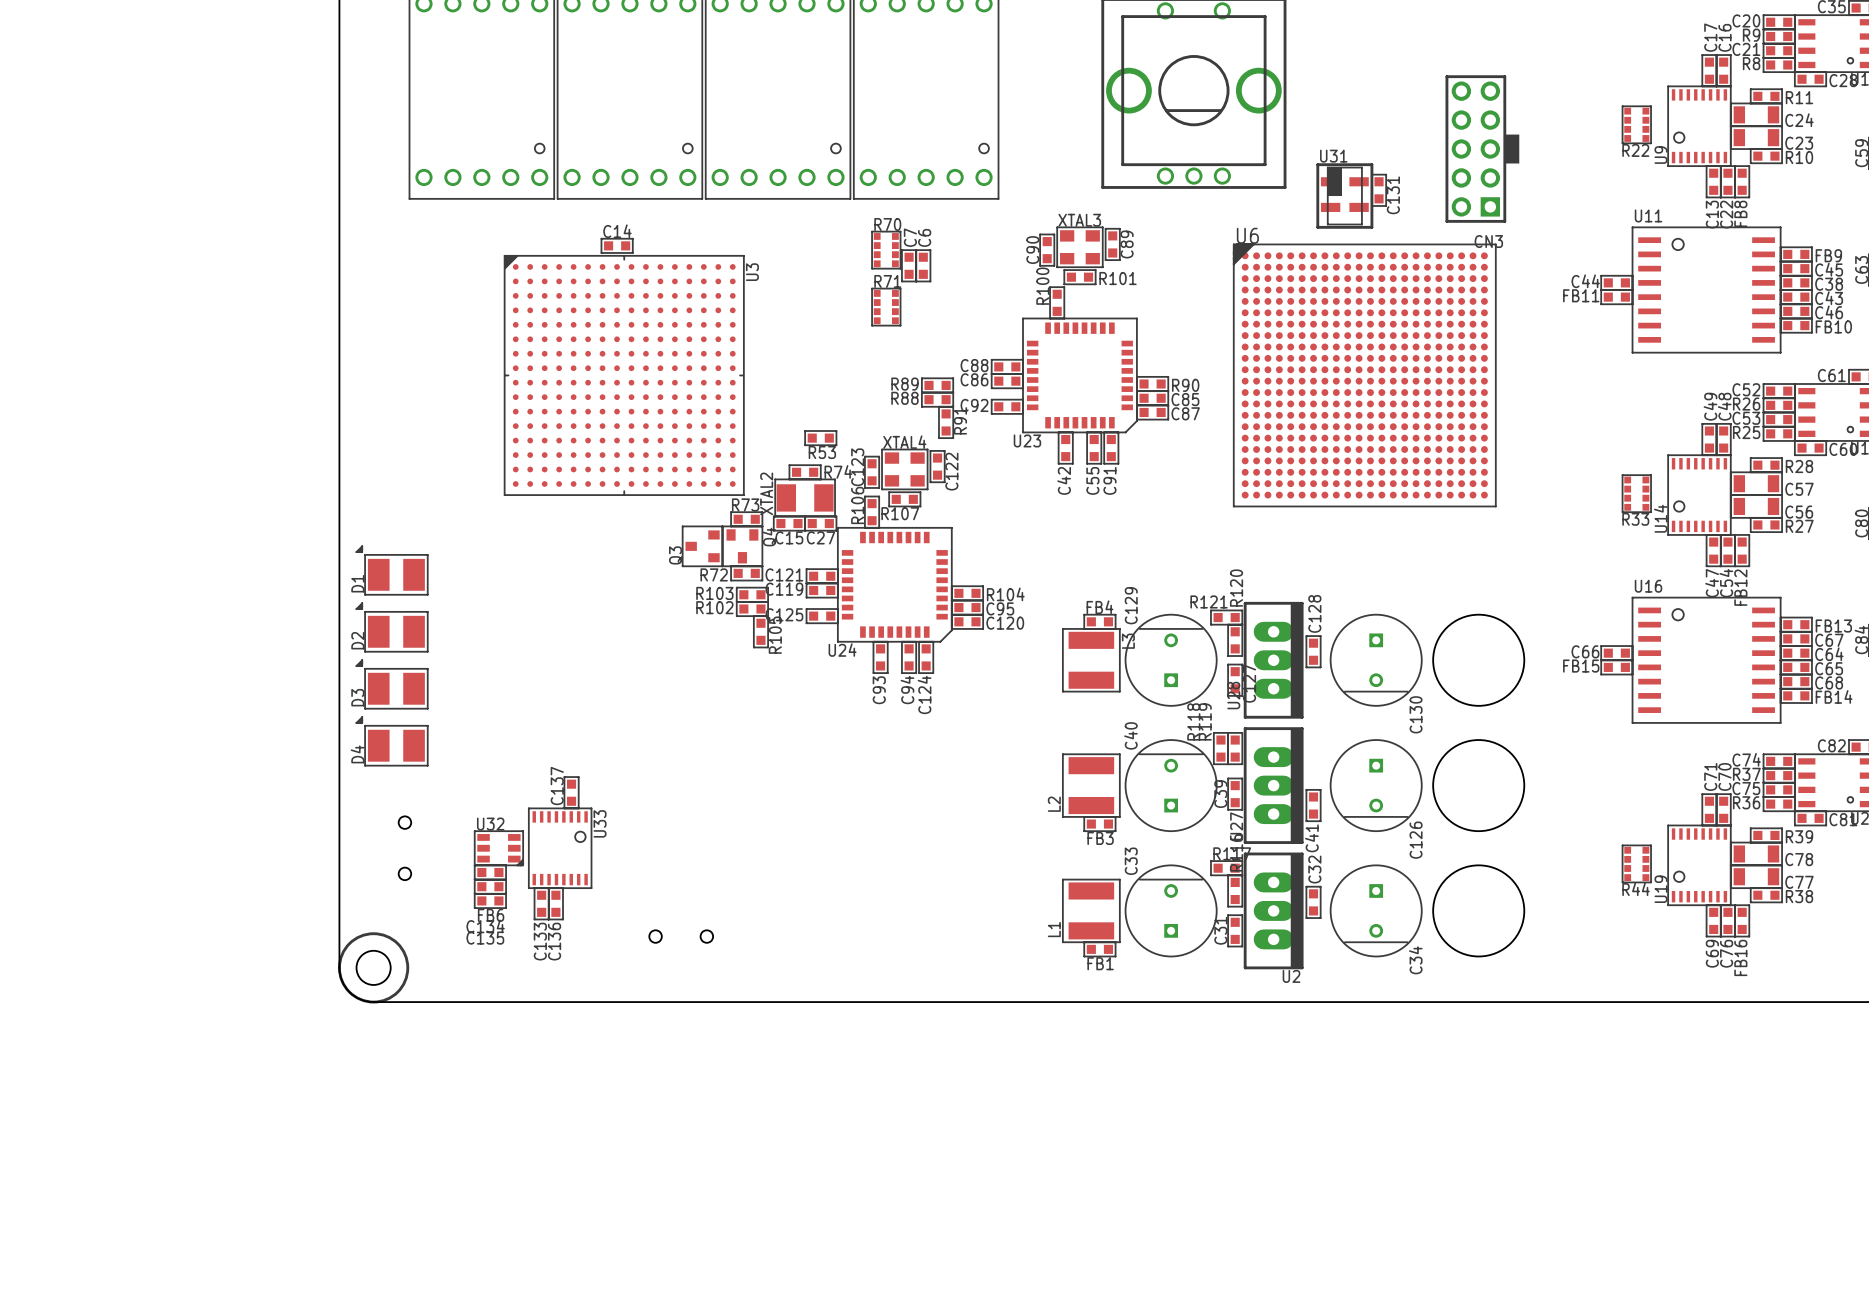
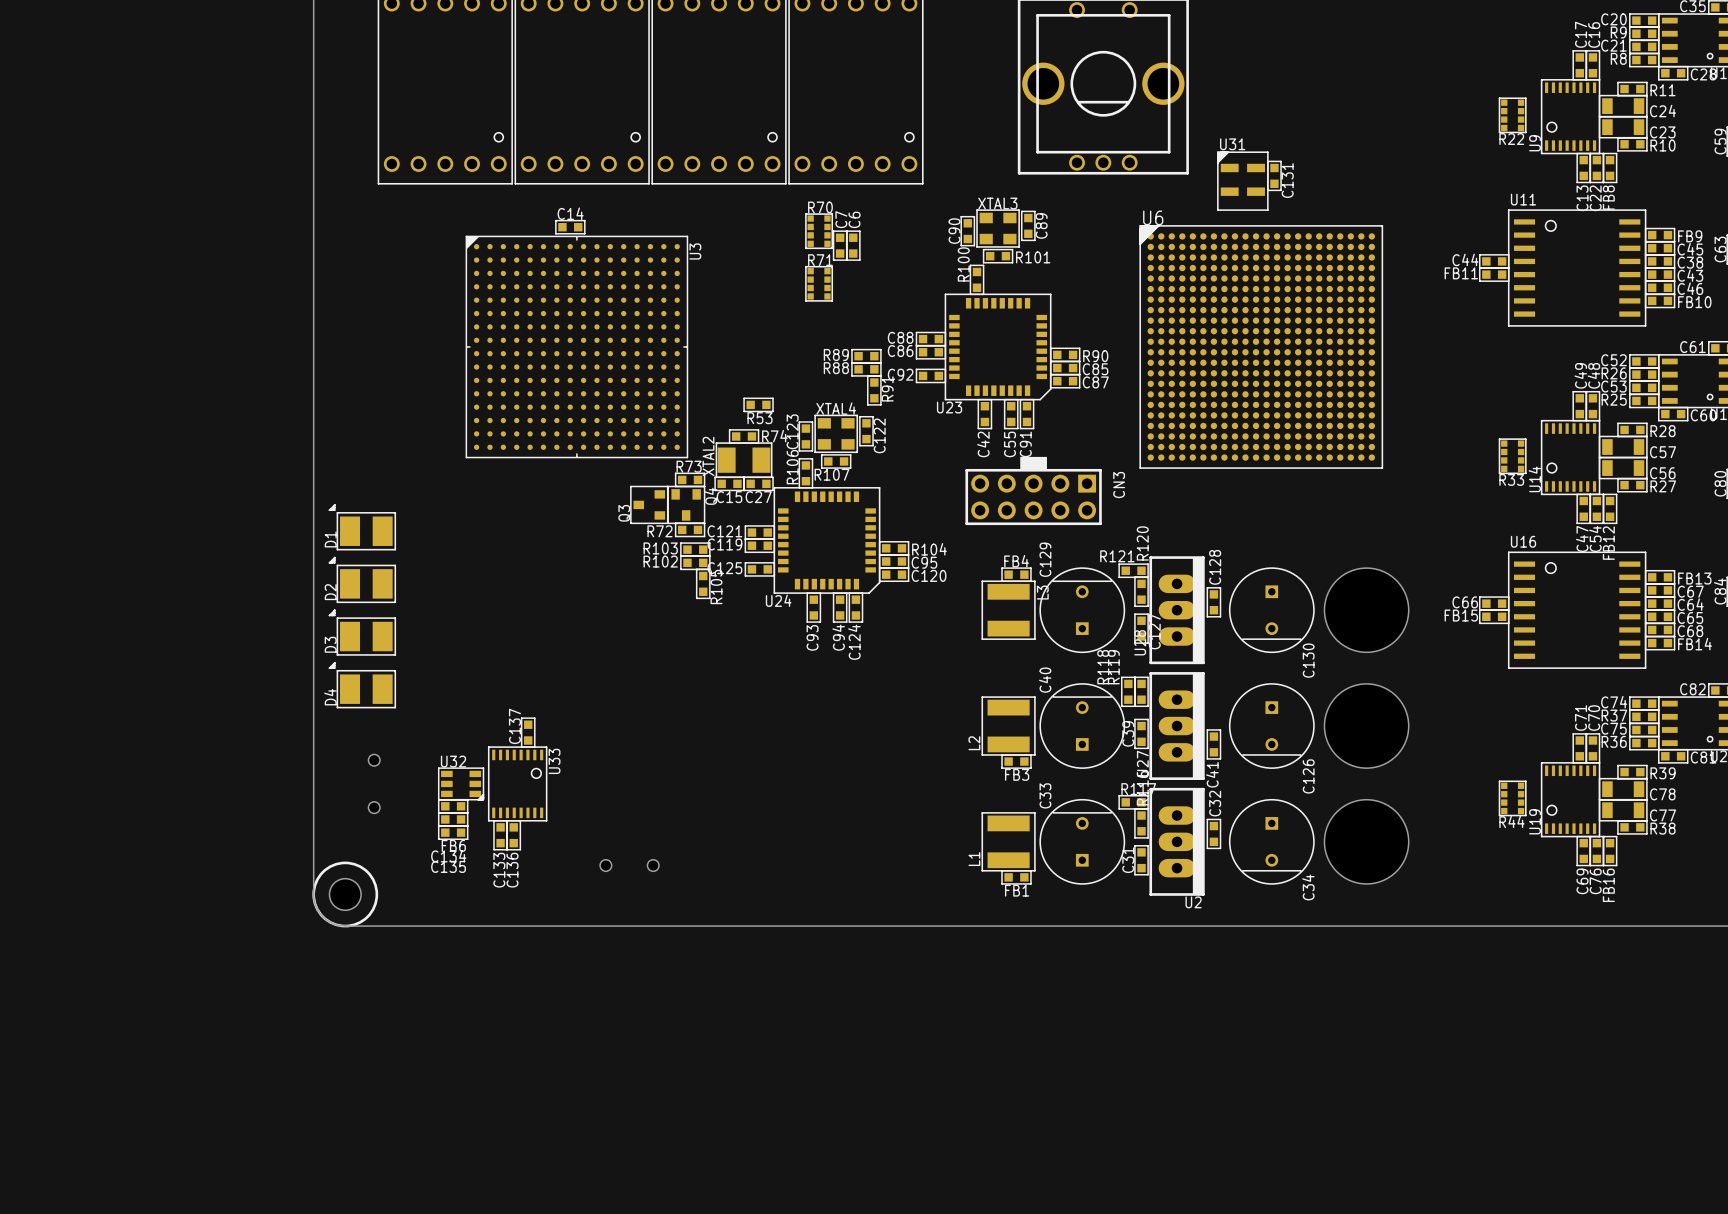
CN3 rotation: 0° (1482, 149) -> 90° counterclockwise (1033, 490)
CN3 position: (1482, 149) -> (1033, 490)
U31 footprint: [1316, 163, 1374, 229] -> [1217, 151, 1269, 211]

